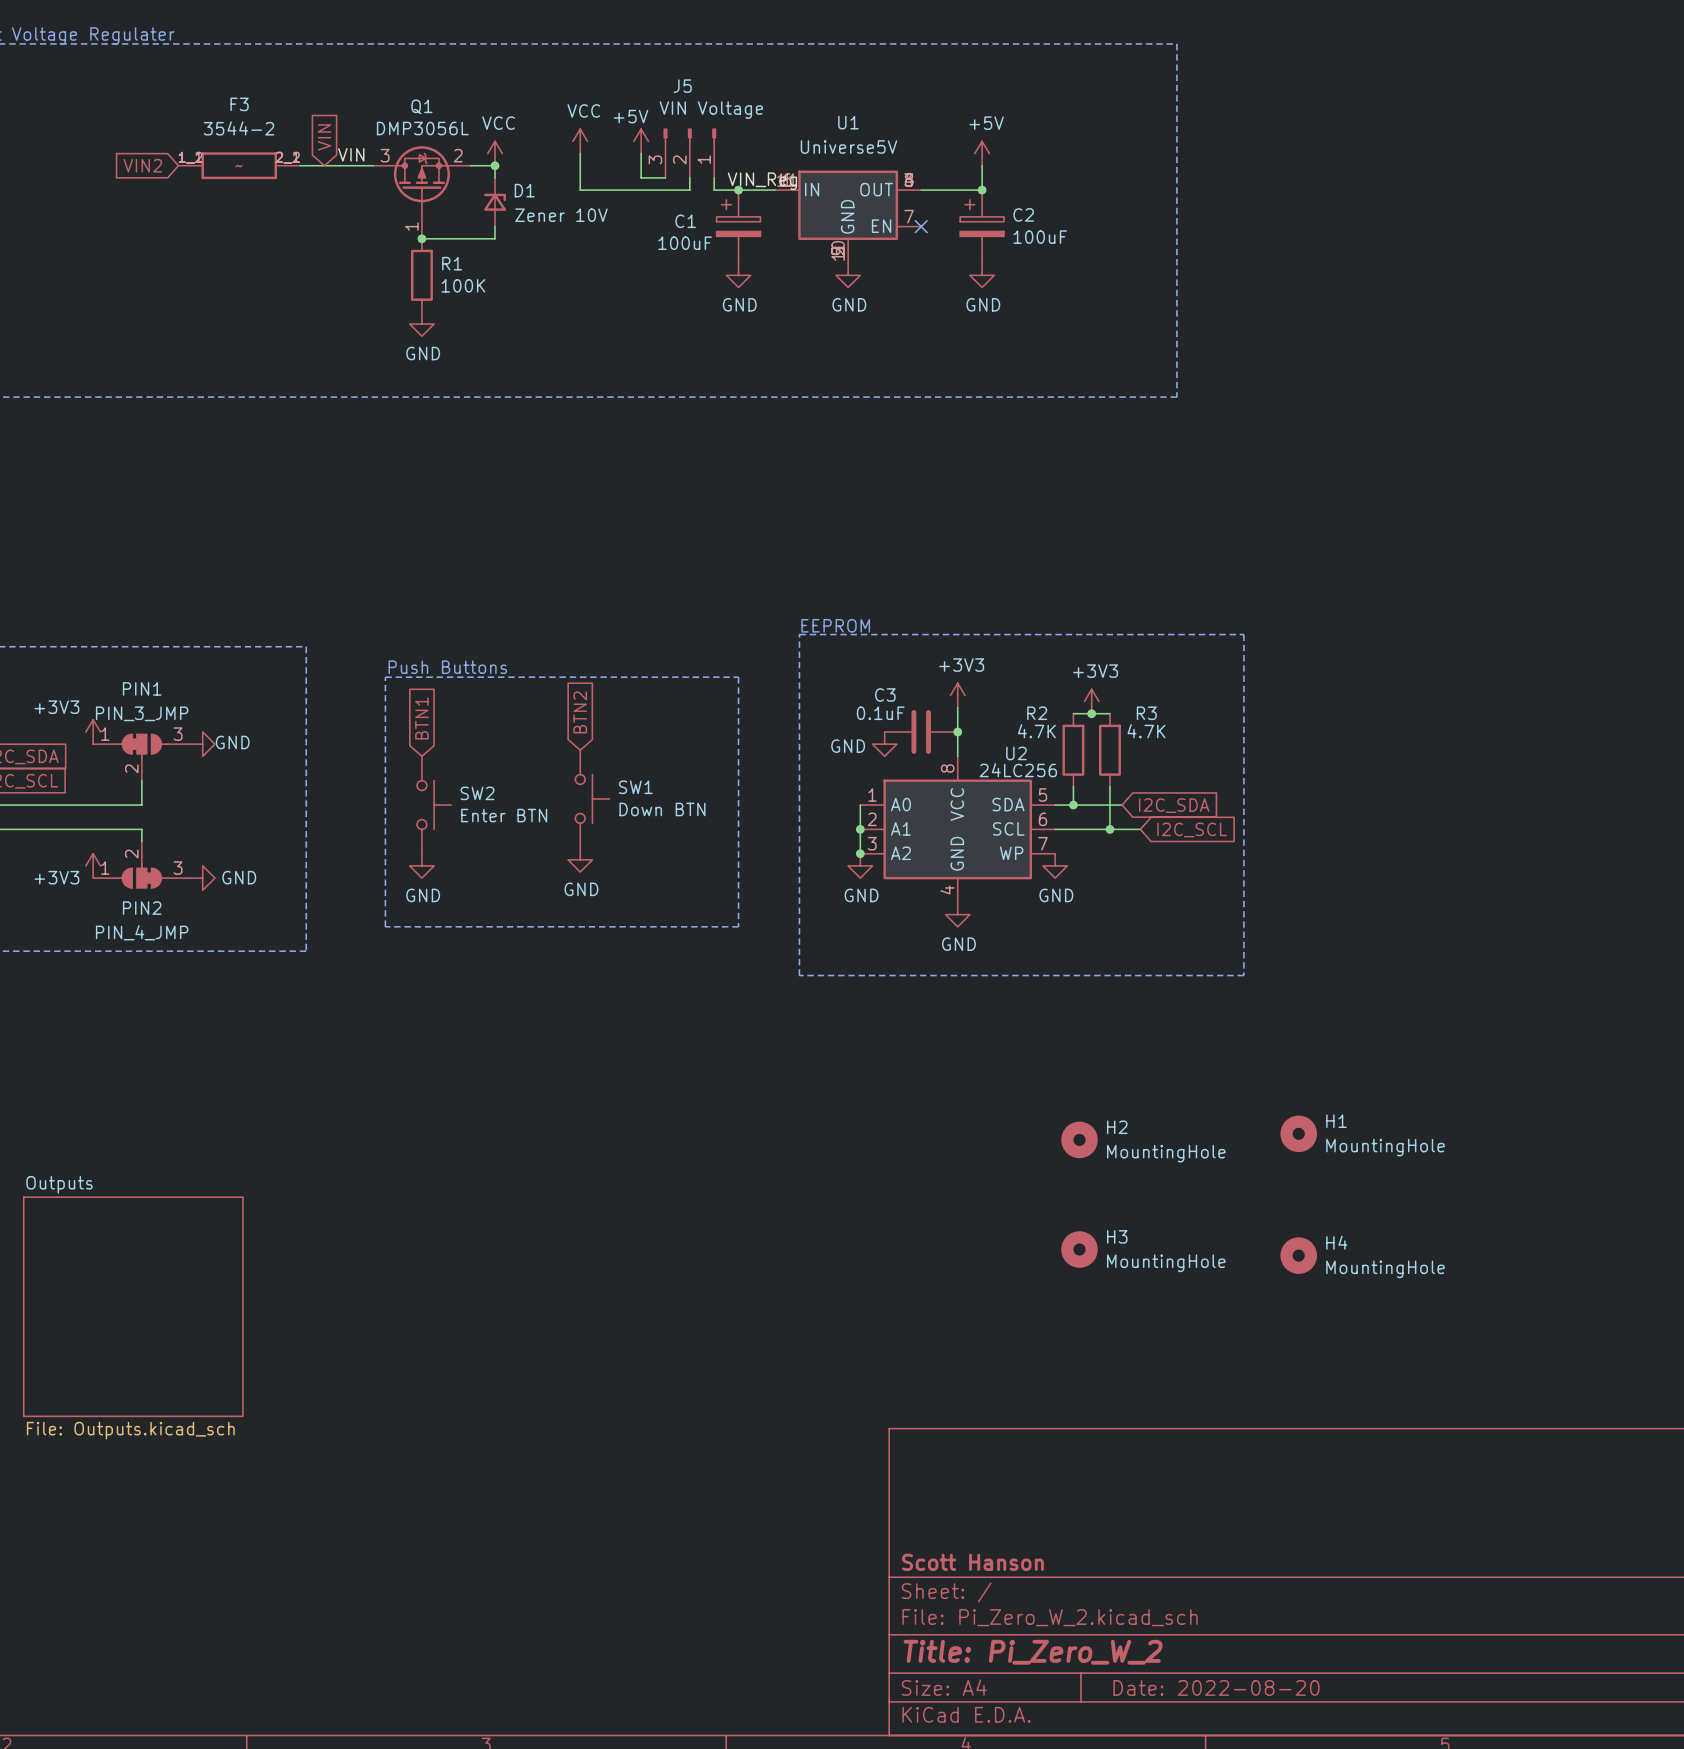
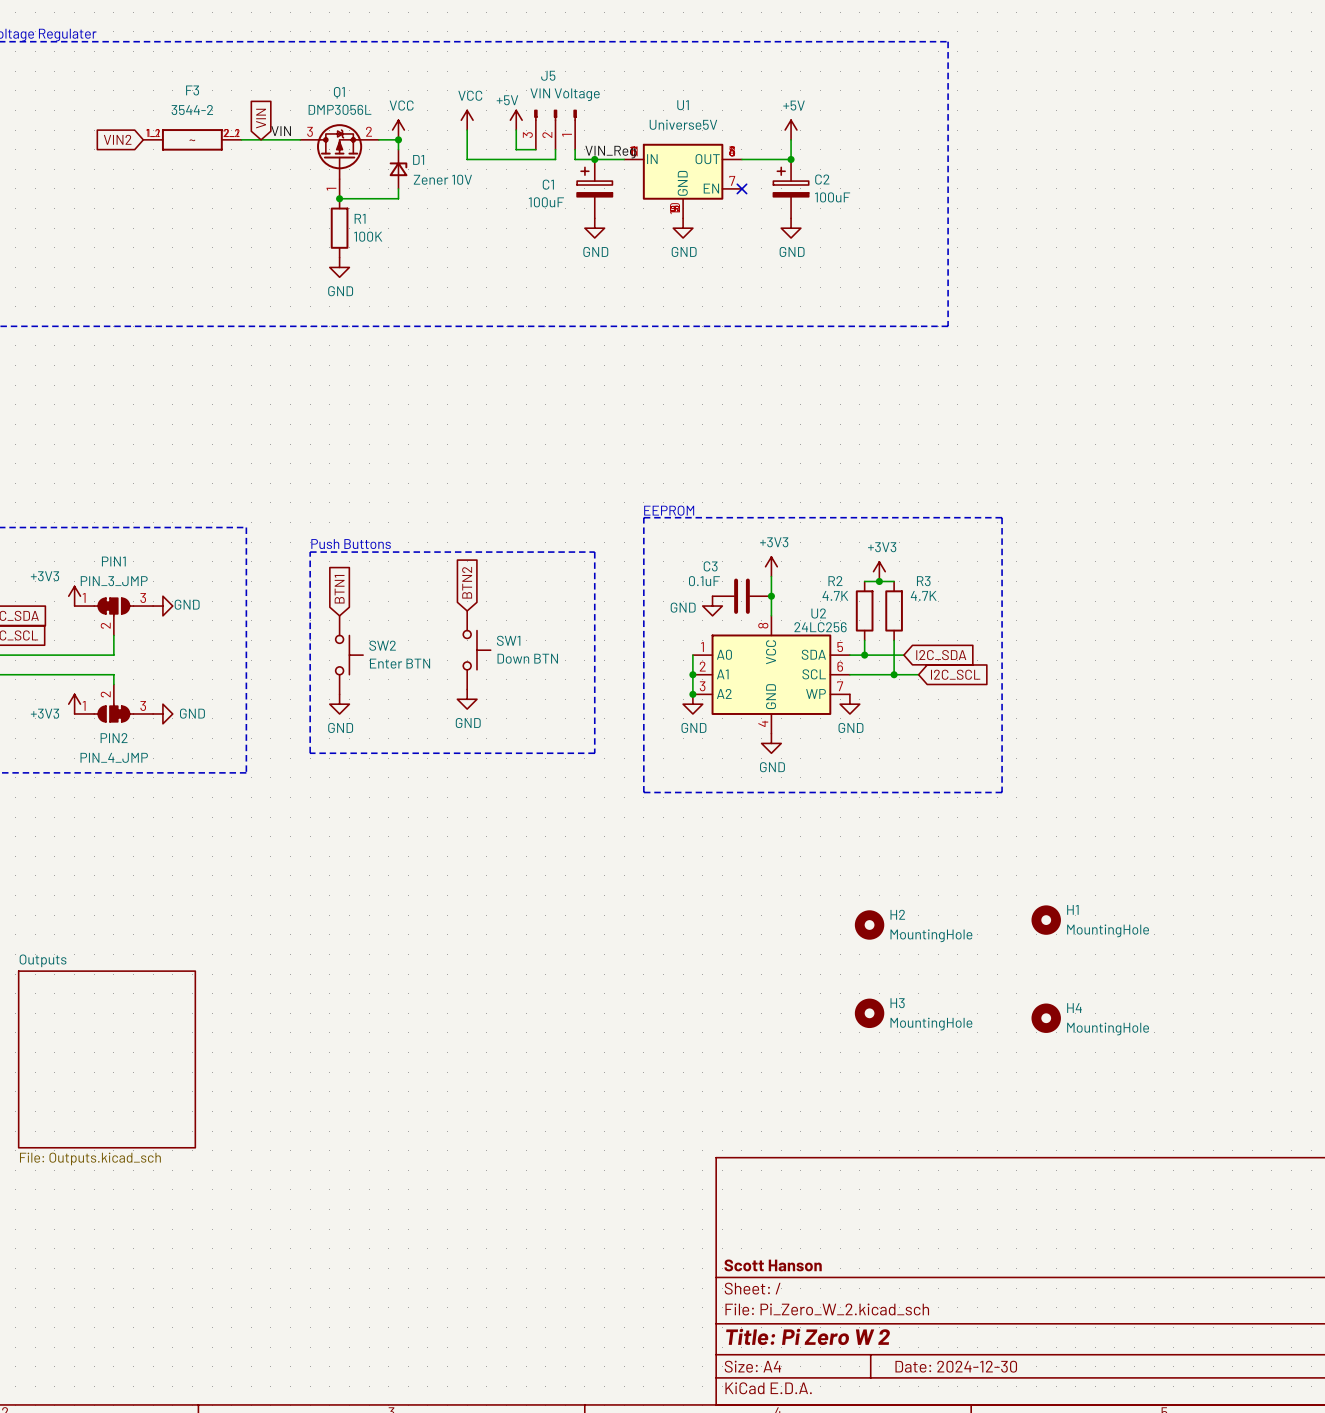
title block: Title: Pi_Zero_W_2 (1033, 1652) -> Title: Pi Zero W 2 (808, 1336)
title block: Date: 2022-08-20 (1216, 1687) -> Date: 2024-12-30 (956, 1366)

